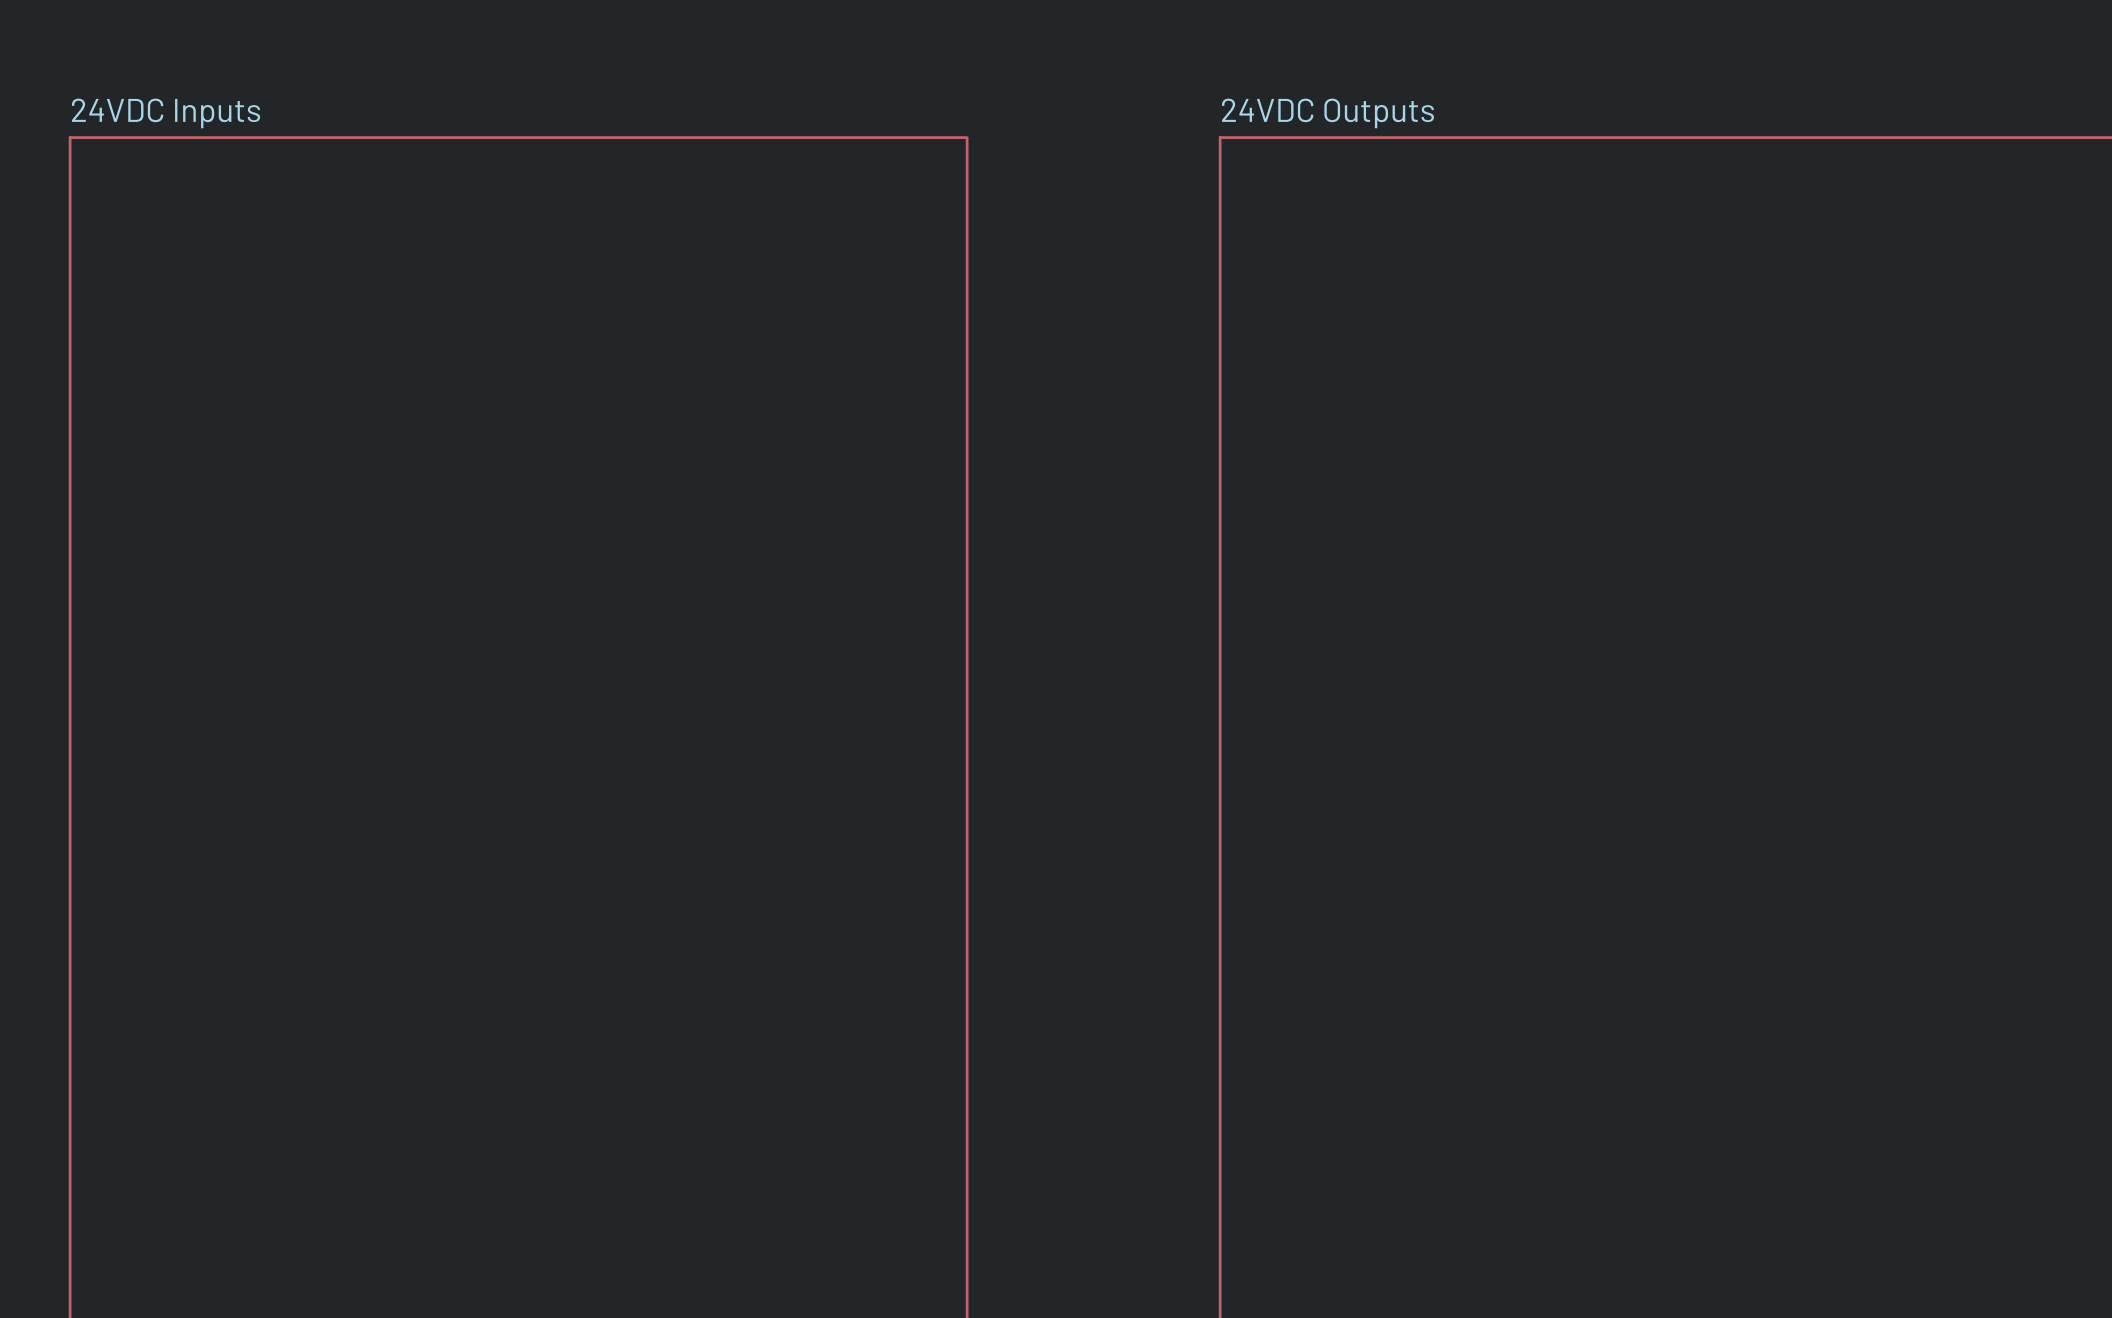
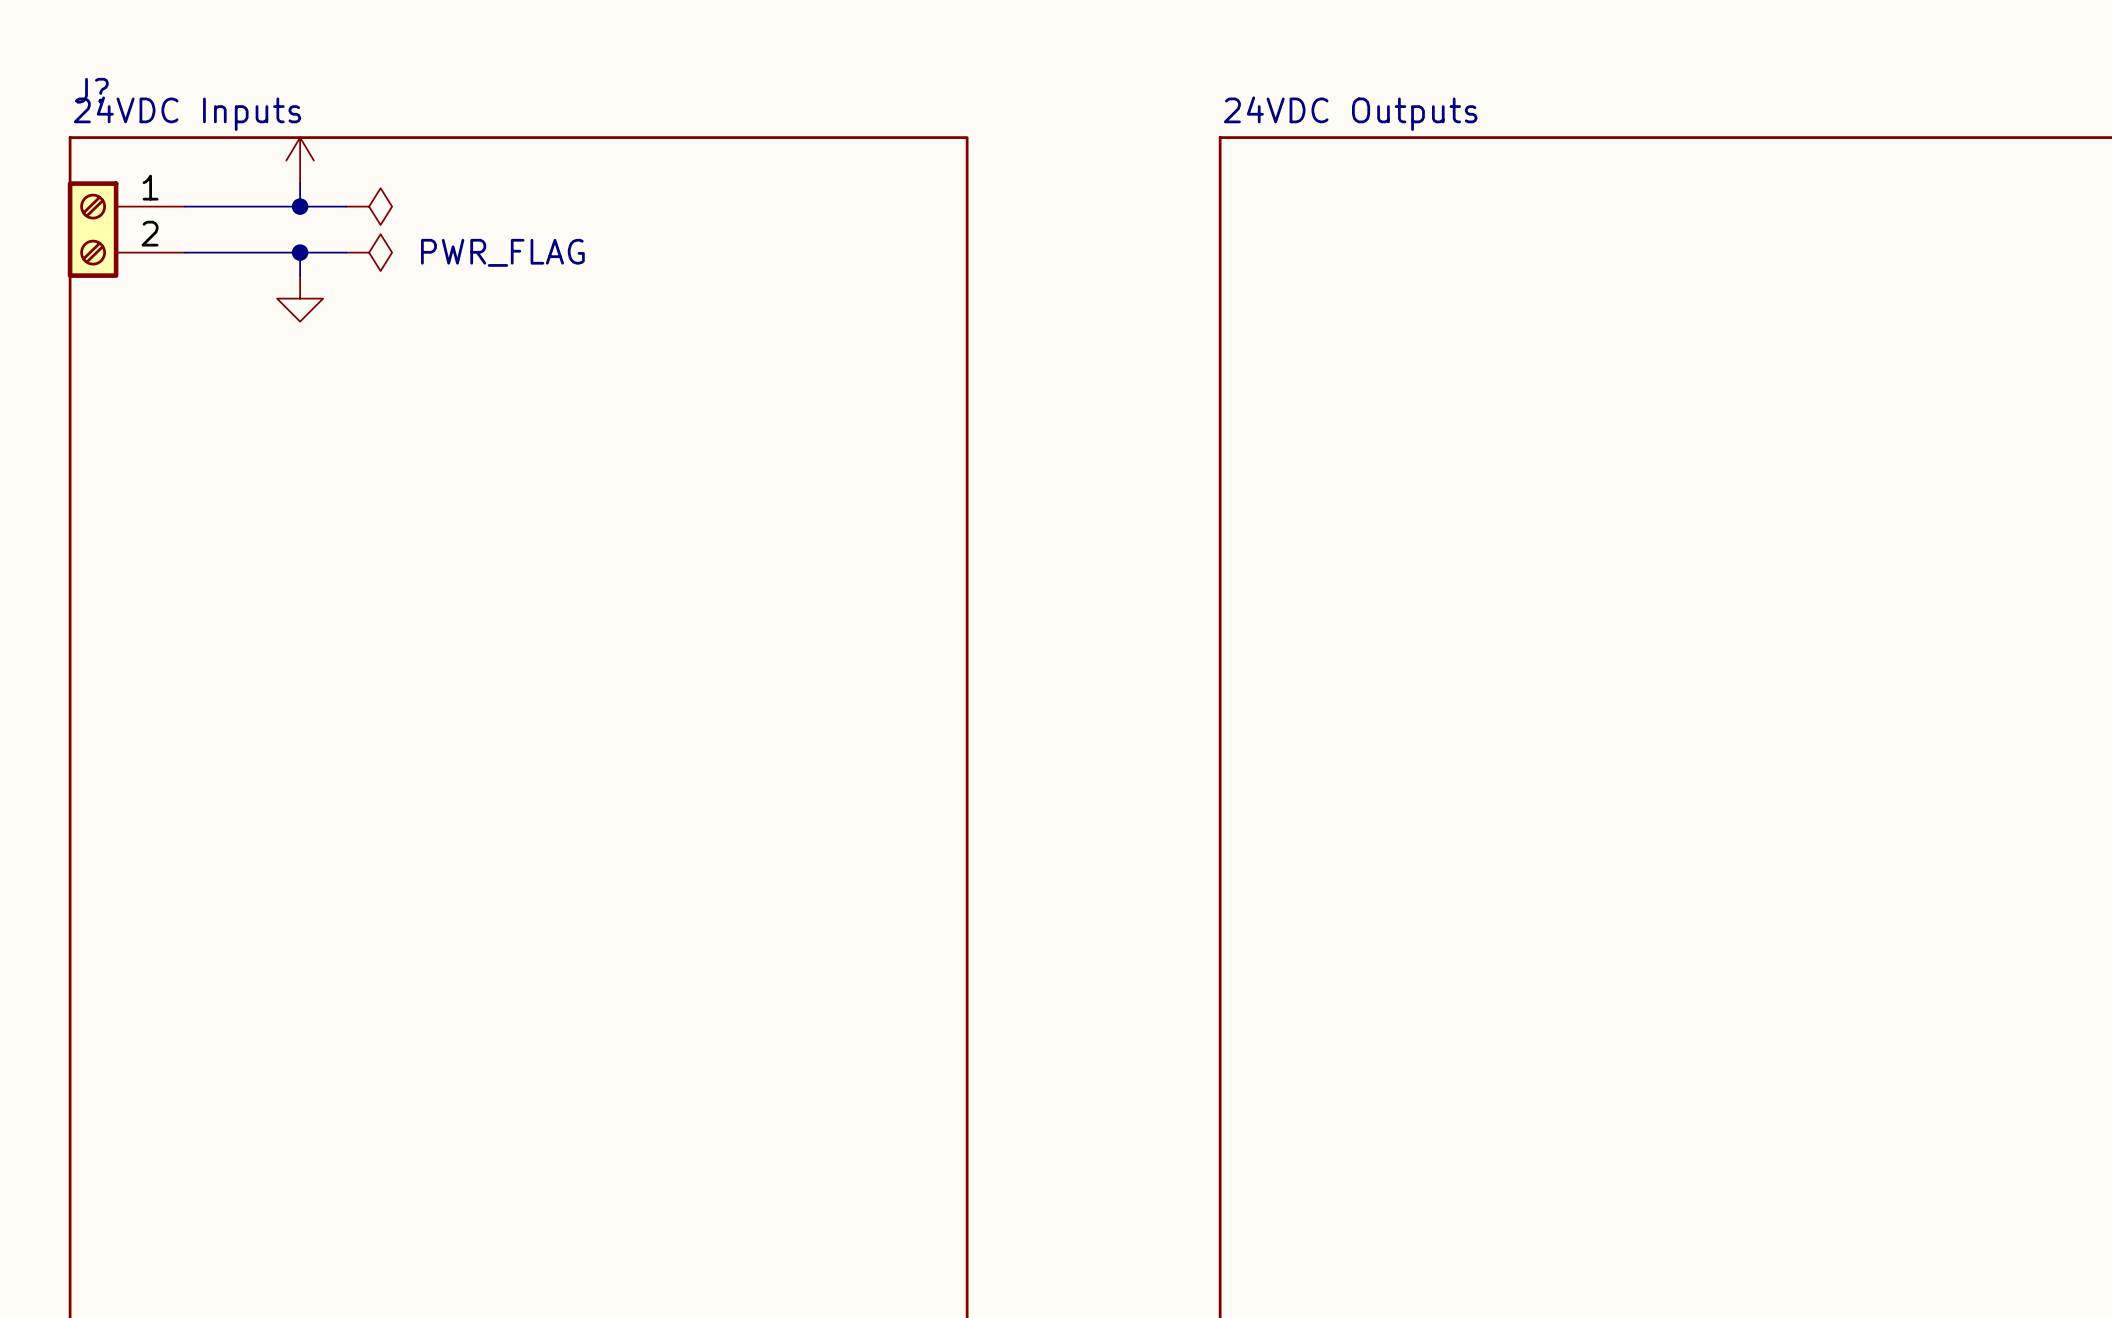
power symbol: none -> (300, 160)
wire: none -> (300, 183) (300, 206)
wire: none -> (185, 206) (346, 206)
junction: none -> (300, 206)
power symbol: none -> (369, 206)
J?: none -> (126, 229)
wire: none -> (185, 252) (346, 252)
wire: none -> (300, 252) (300, 275)
junction: none -> (300, 252)
power symbol: none -> PWR_FLAG (369, 252)
power symbol: none -> (300, 298)

